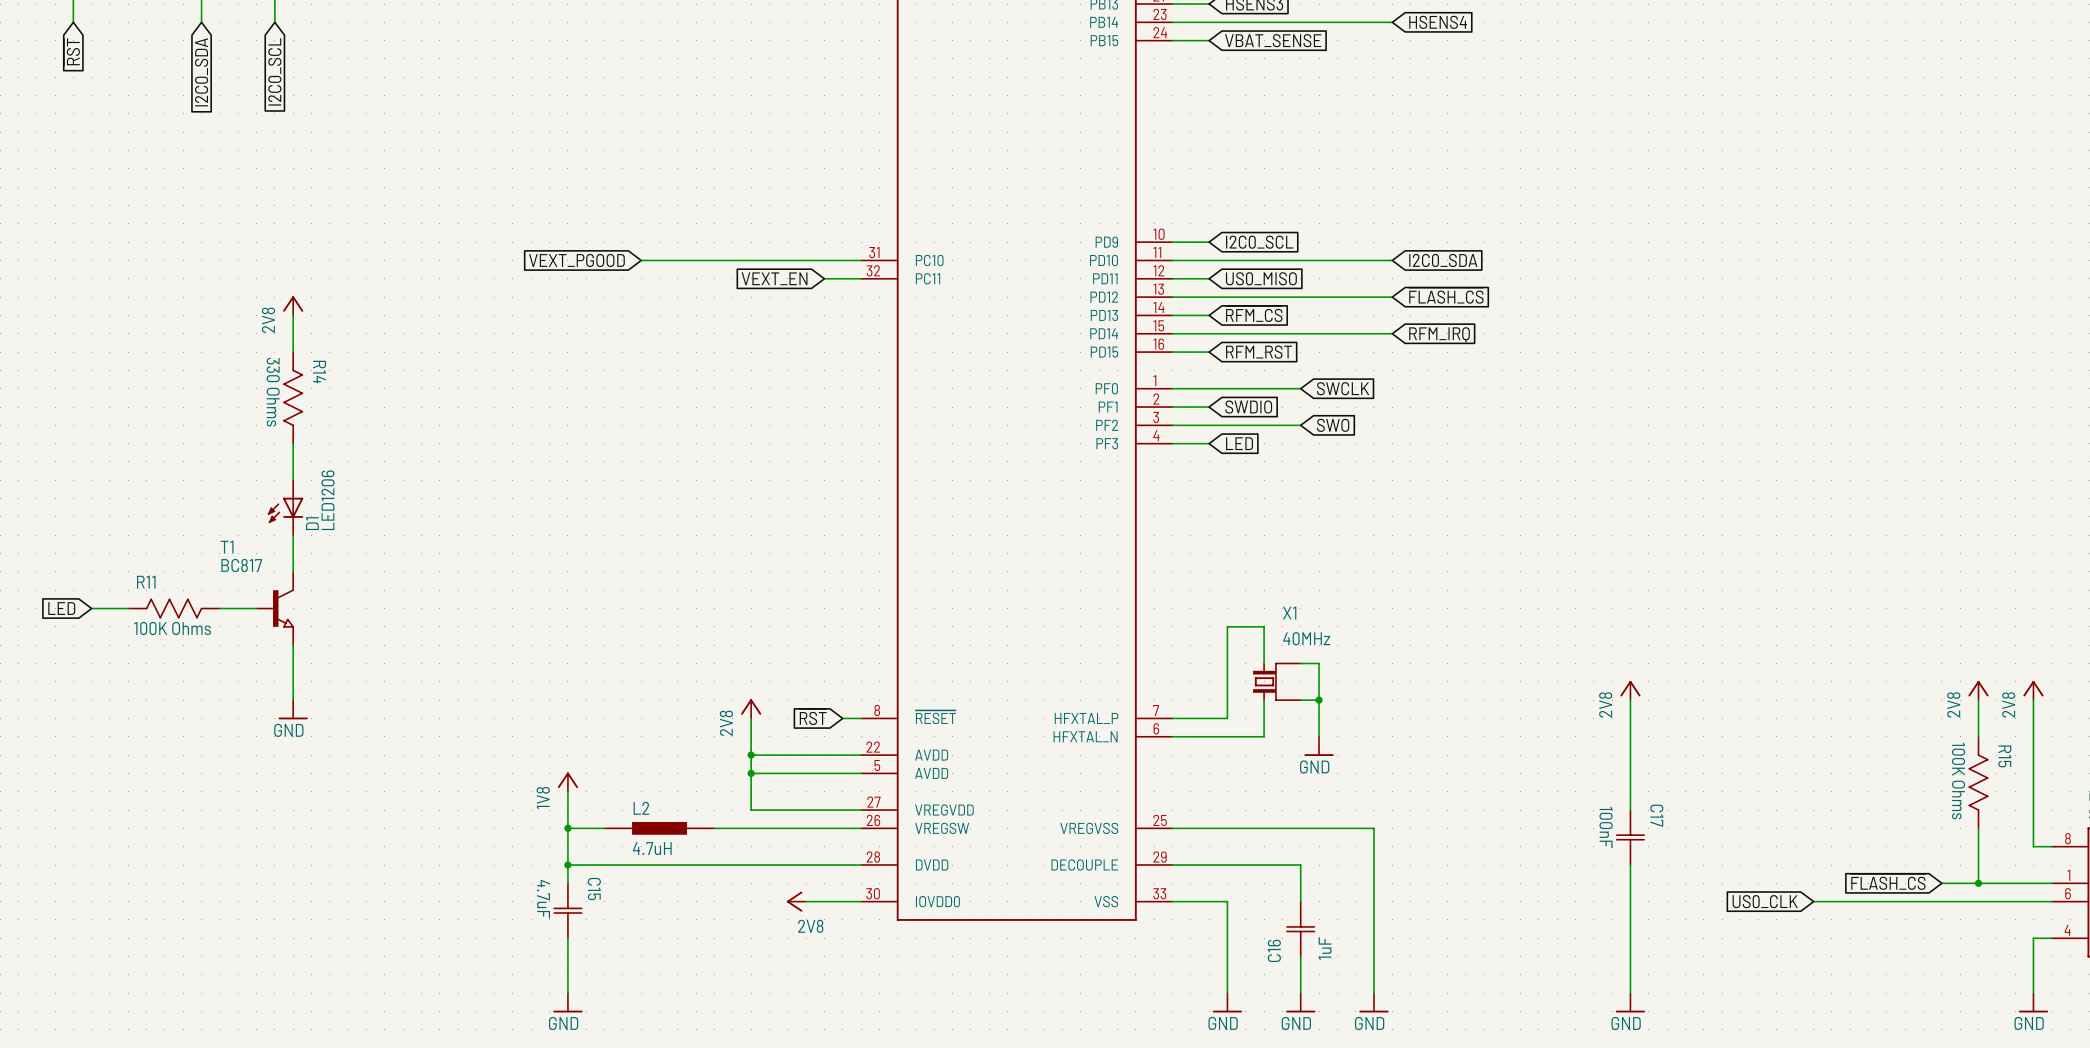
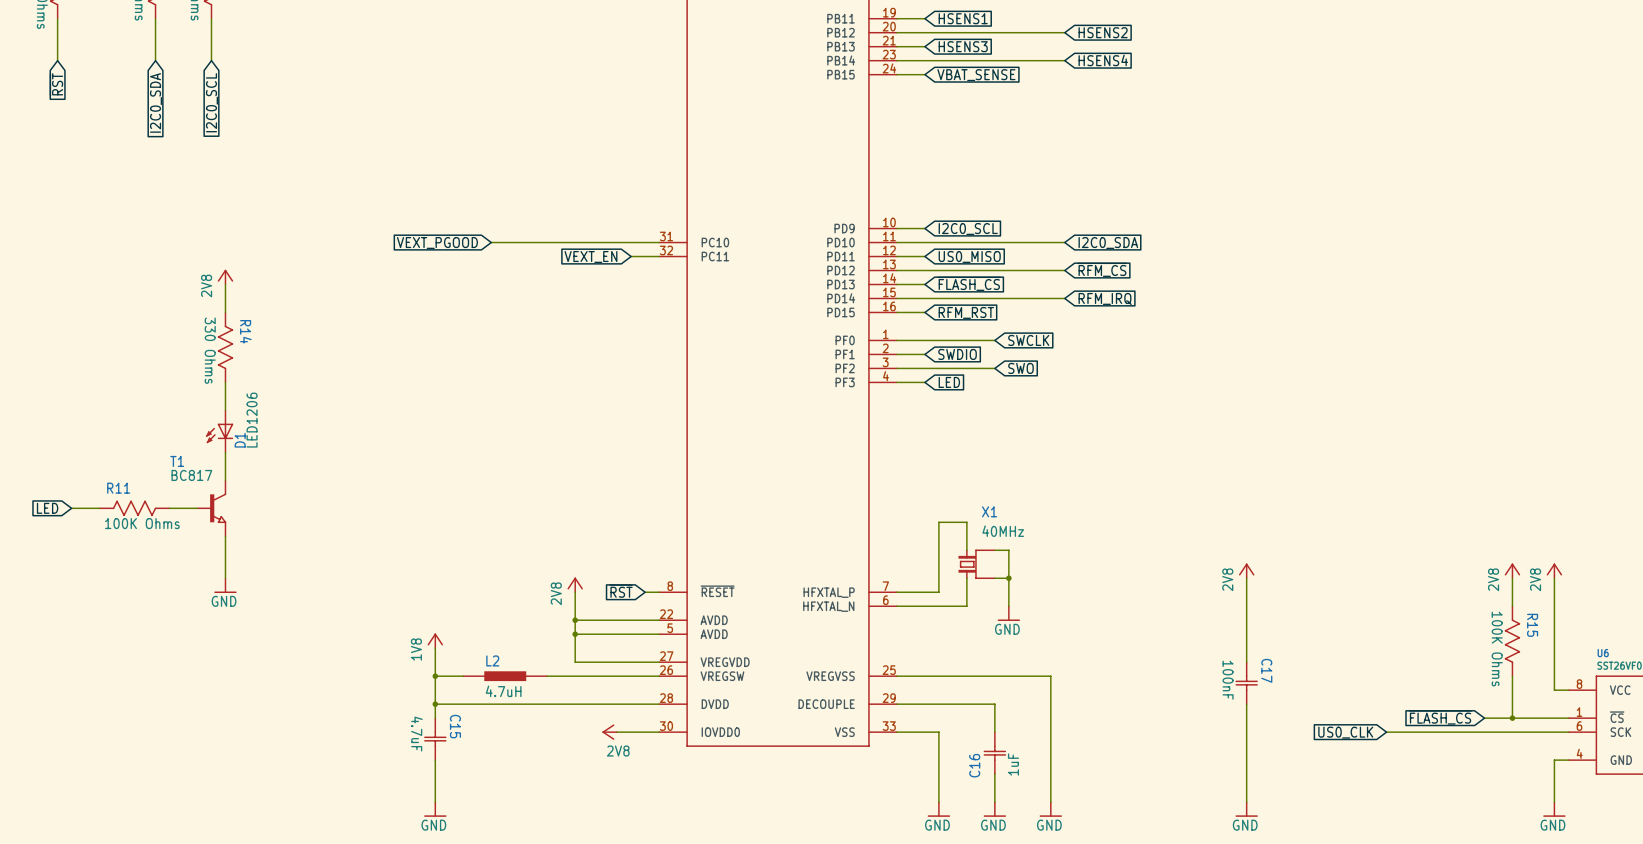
global label: ~{FLASH_CS} (1446, 295) -> ~{RFM_CS} (1102, 269)
global label: ~{RFM_CS} (1254, 314) -> ~{FLASH_CS} (969, 283)

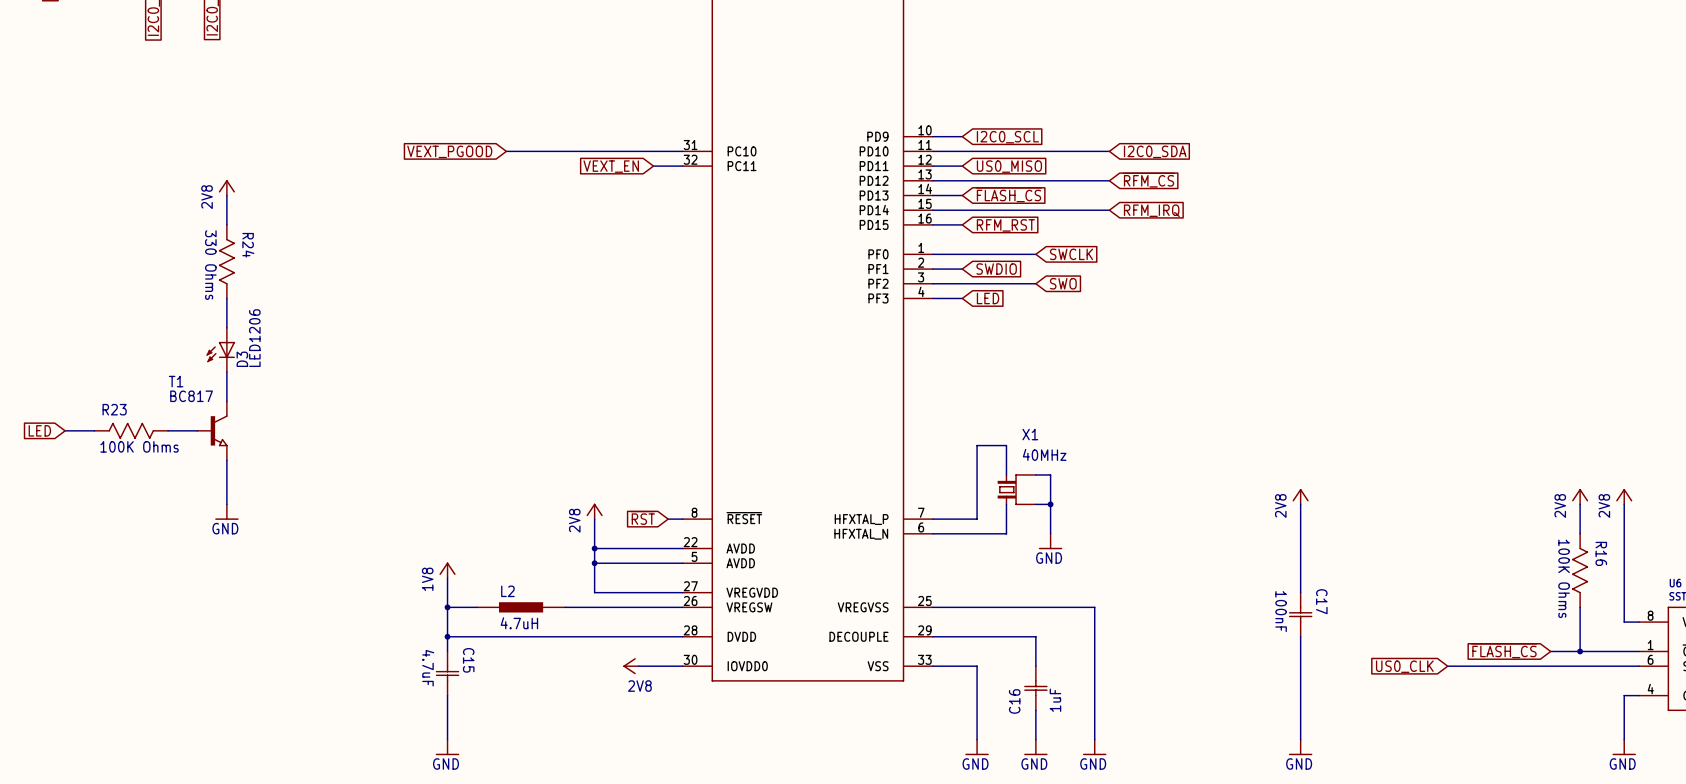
R14 name: R14 (245, 331) -> R24 (248, 245)
D1 name: D1 (240, 440) -> D3 (242, 359)
R11 name: R11 (118, 488) -> R23 (114, 409)
R15 name: R15 (1532, 625) -> R16 (1601, 553)

